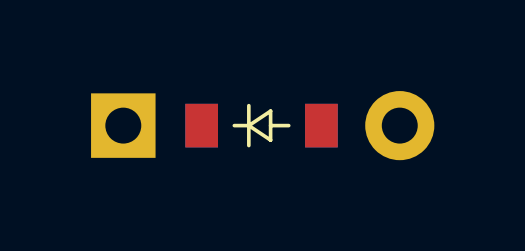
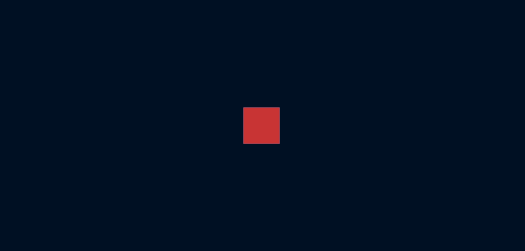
part footprint: [91, 91, 435, 161] -> [243, 107, 280, 144]

